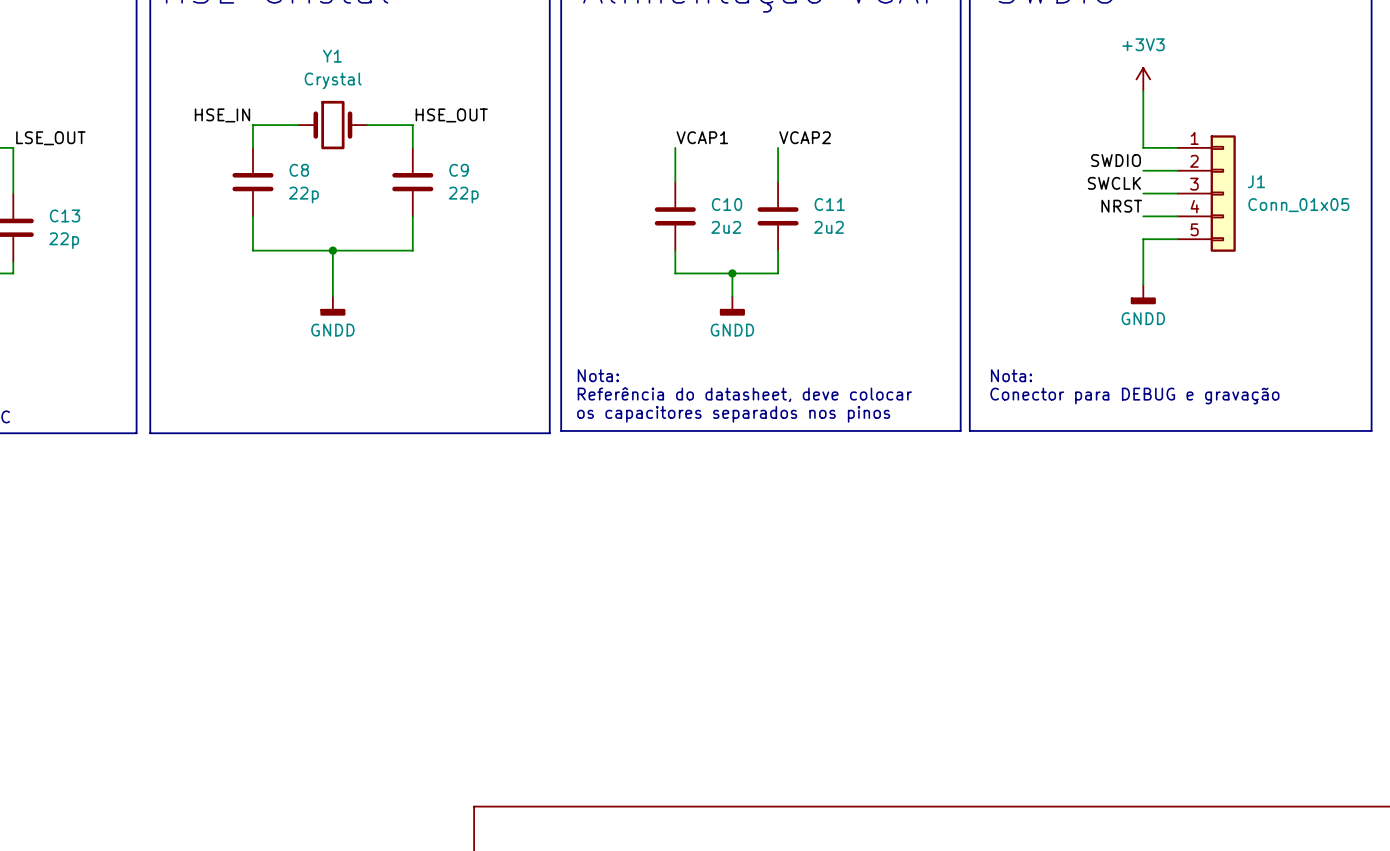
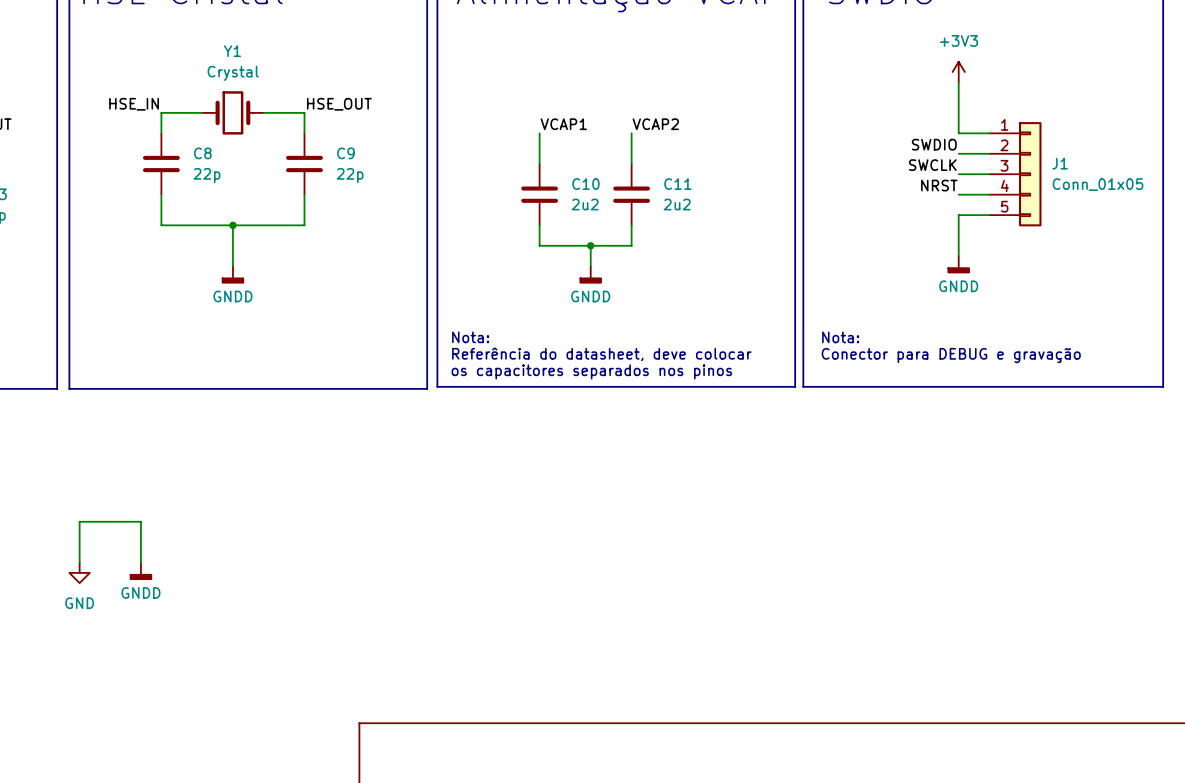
wire: none -> (79, 562) (79, 521) (140, 521) (140, 562)
power symbol: none -> GNDD (140, 571)
power symbol: none -> GND (79, 572)

